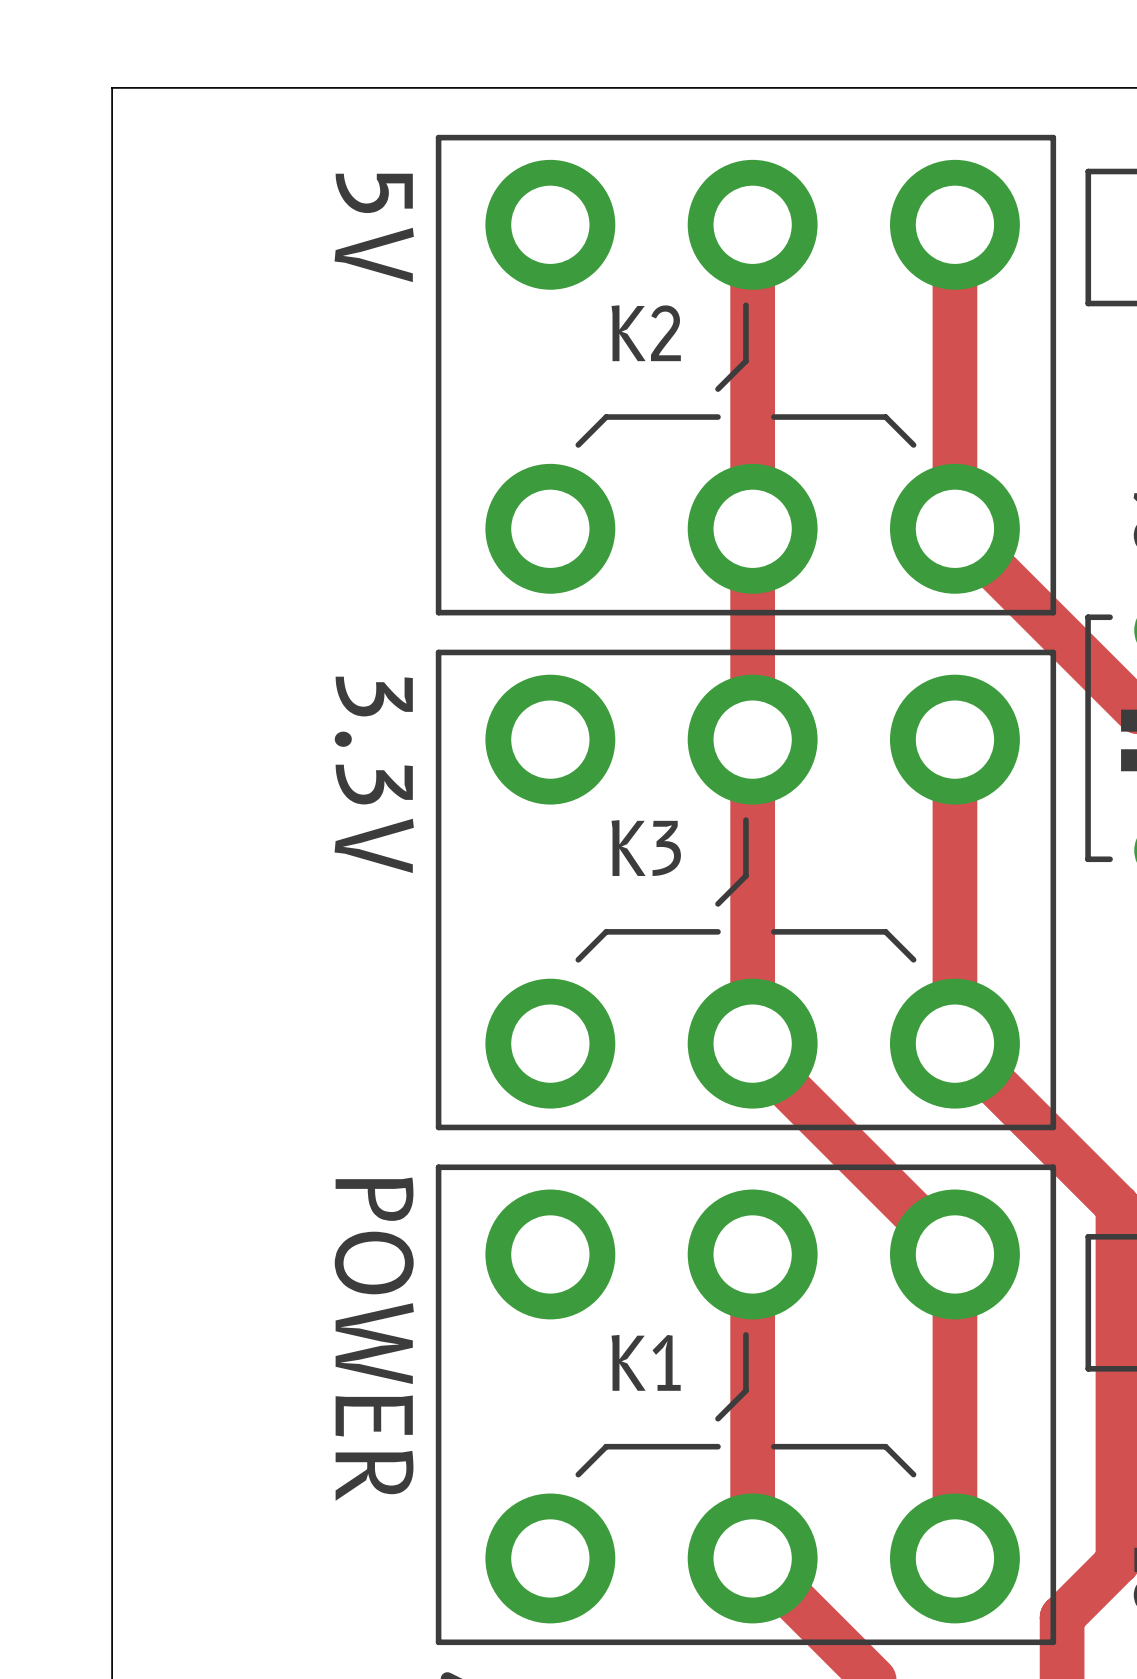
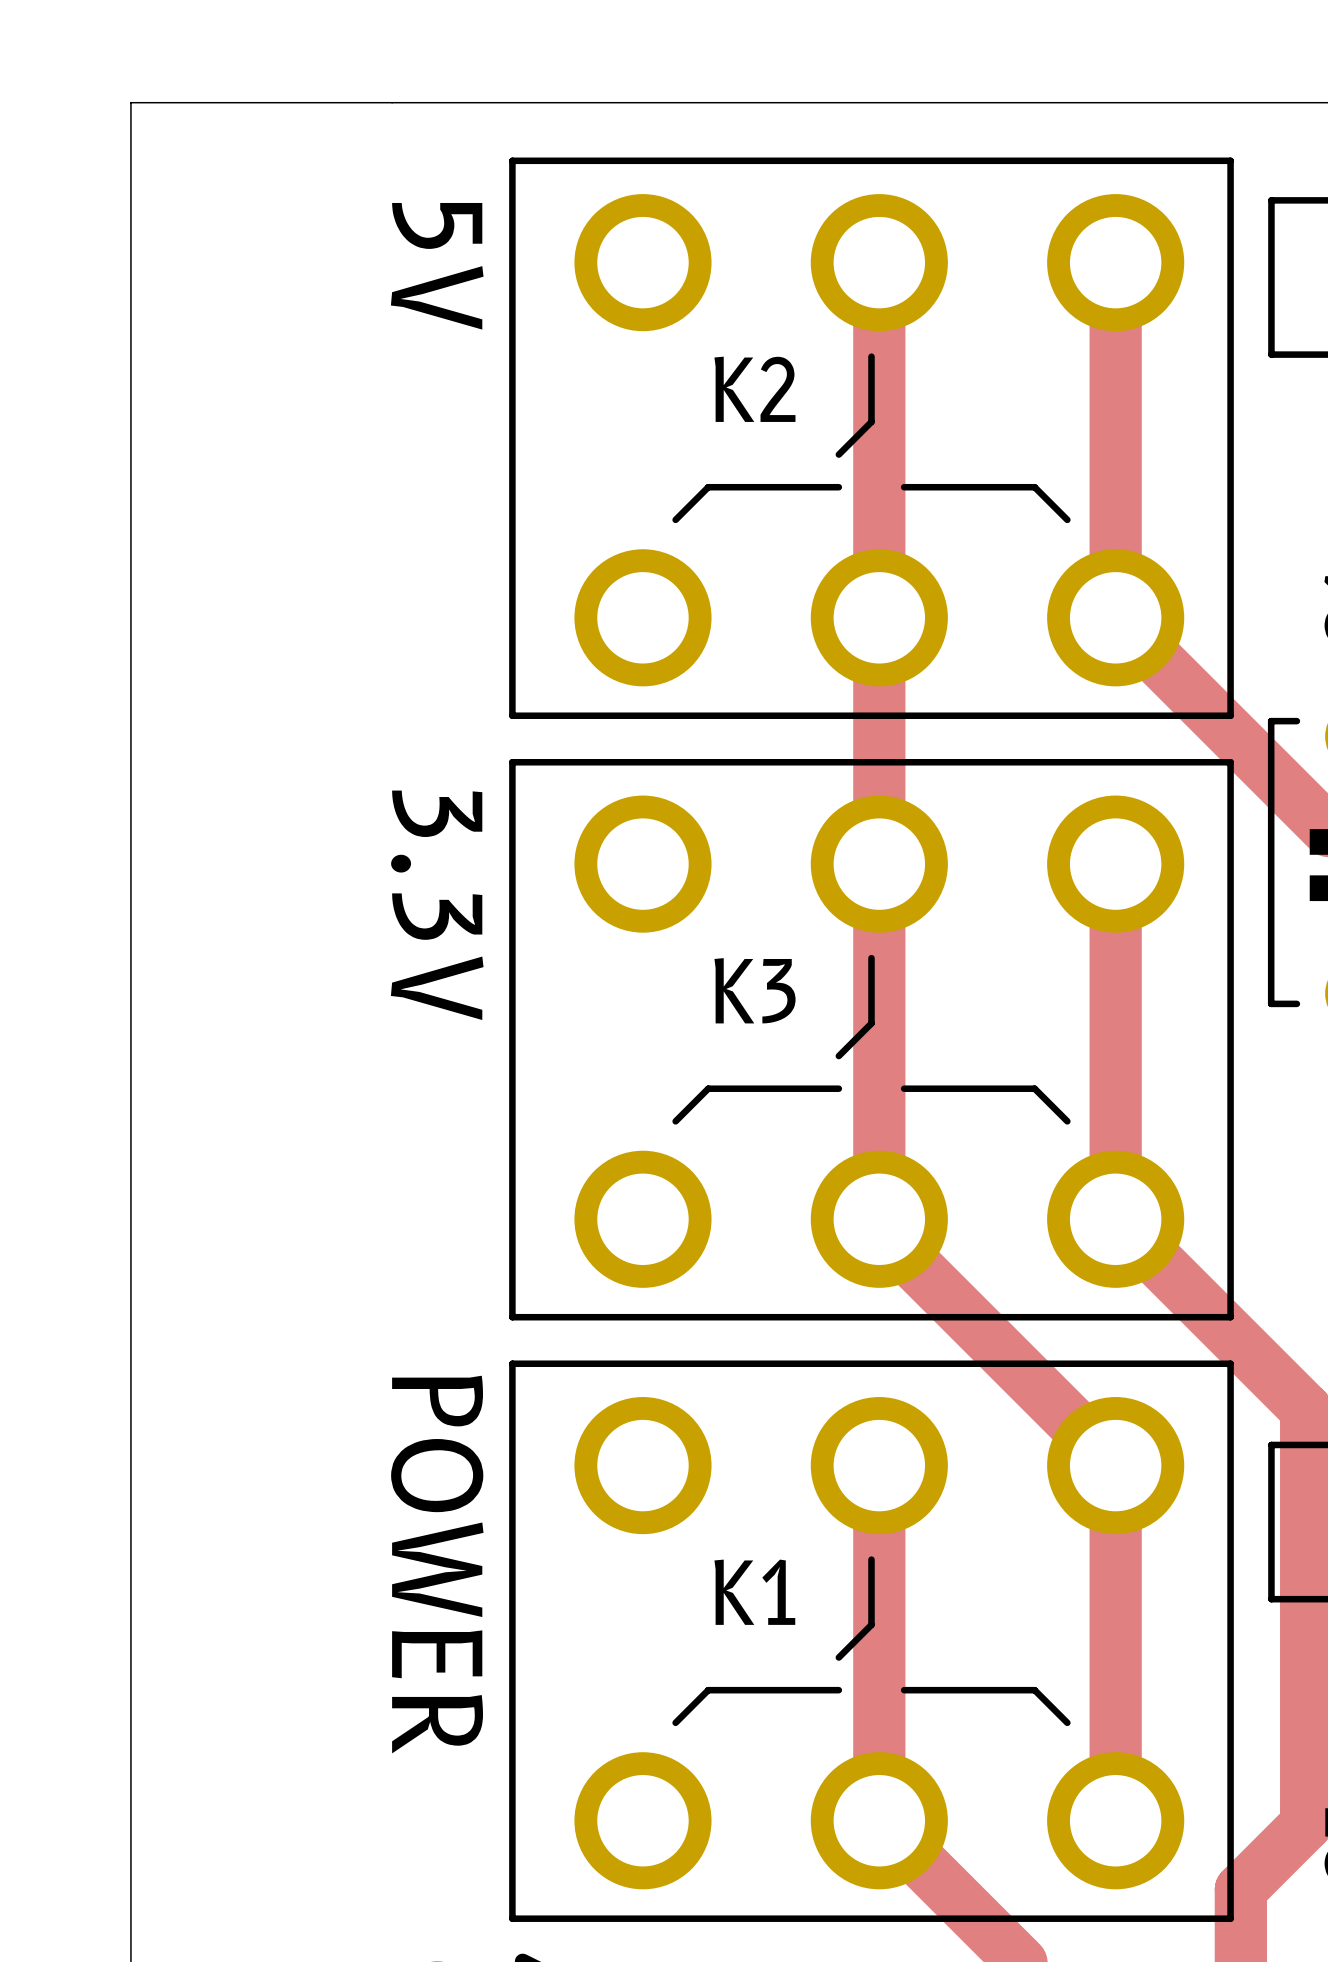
K2 footprint: [435, 134, 1057, 616] -> [509, 157, 1234, 720]
K3 footprint: [435, 649, 1057, 1131] -> [509, 759, 1234, 1321]
K1 footprint: [435, 1164, 1057, 1646] -> [509, 1360, 1234, 1922]

